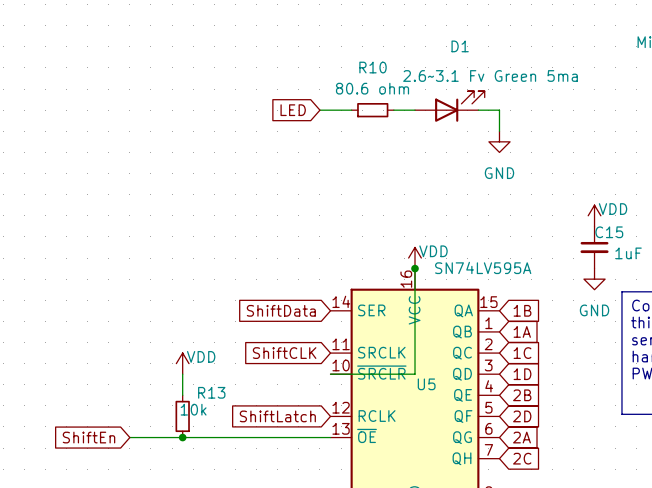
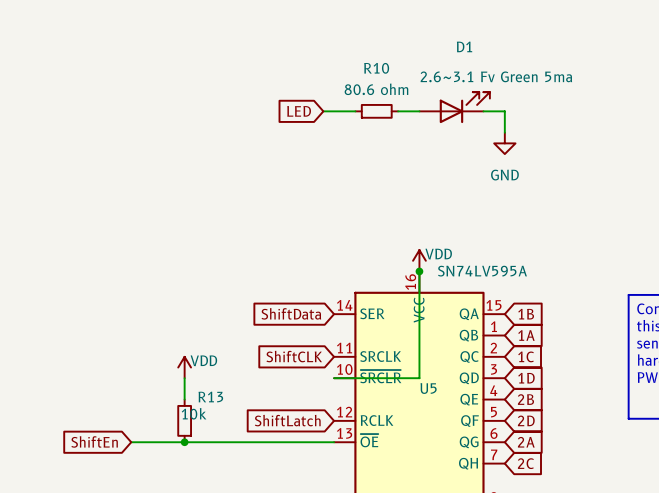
power symbol: VDD (594, 215) -> none
C15: 1uF (594, 247) -> none
power symbol: GND (594, 279) -> none

